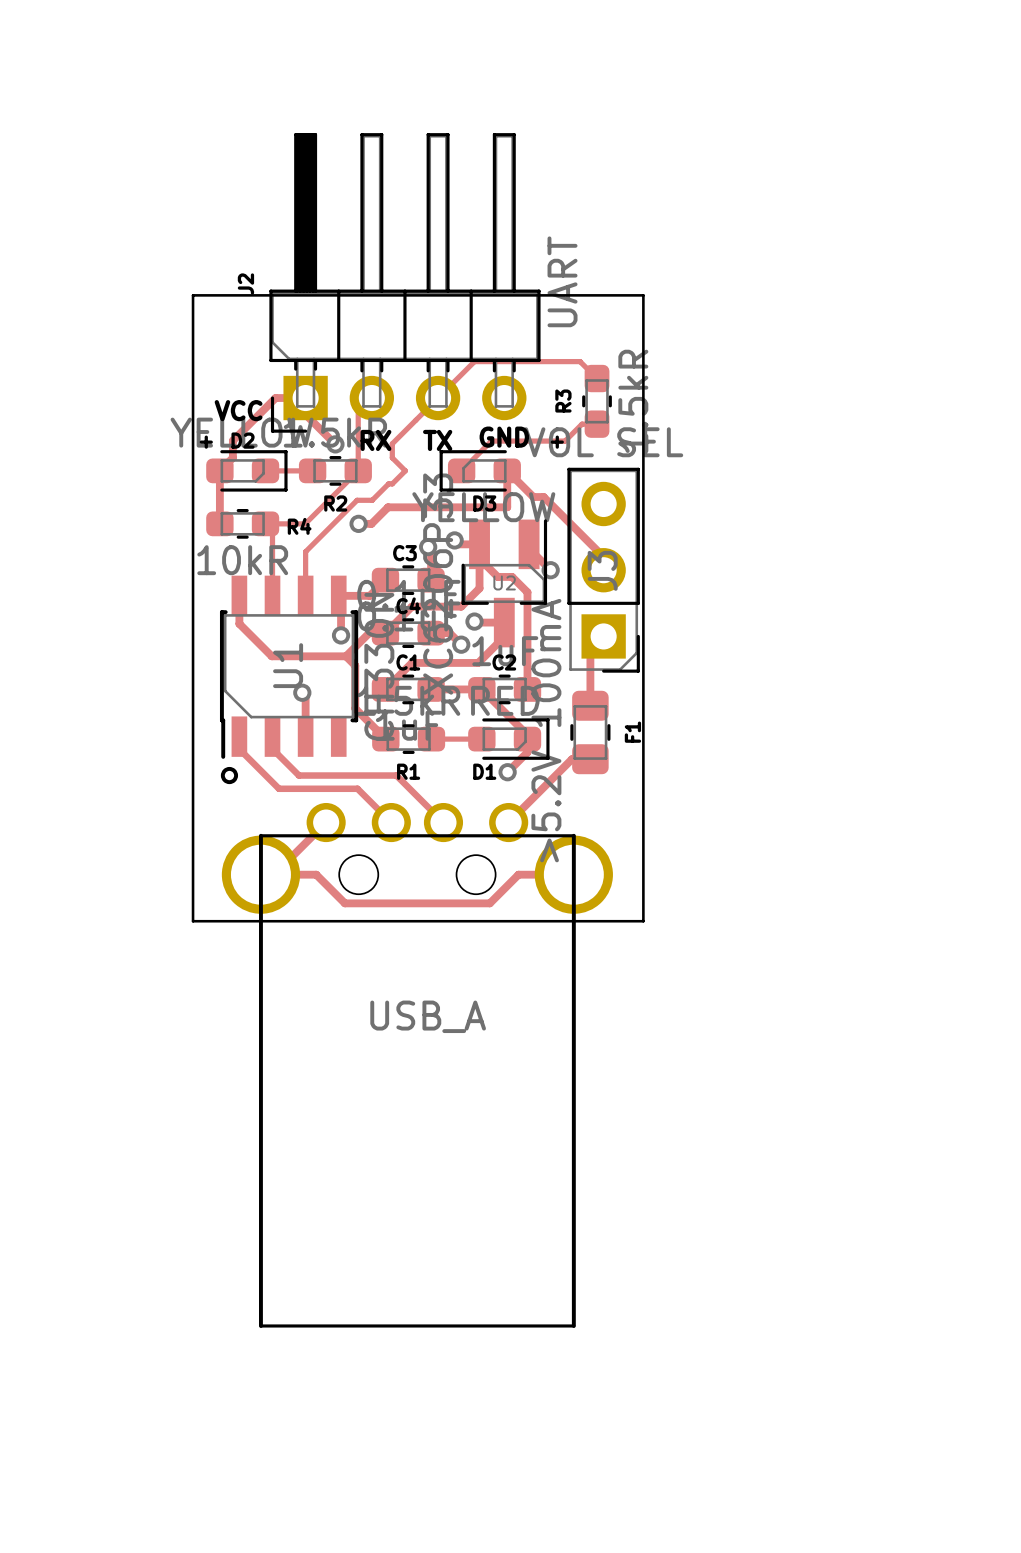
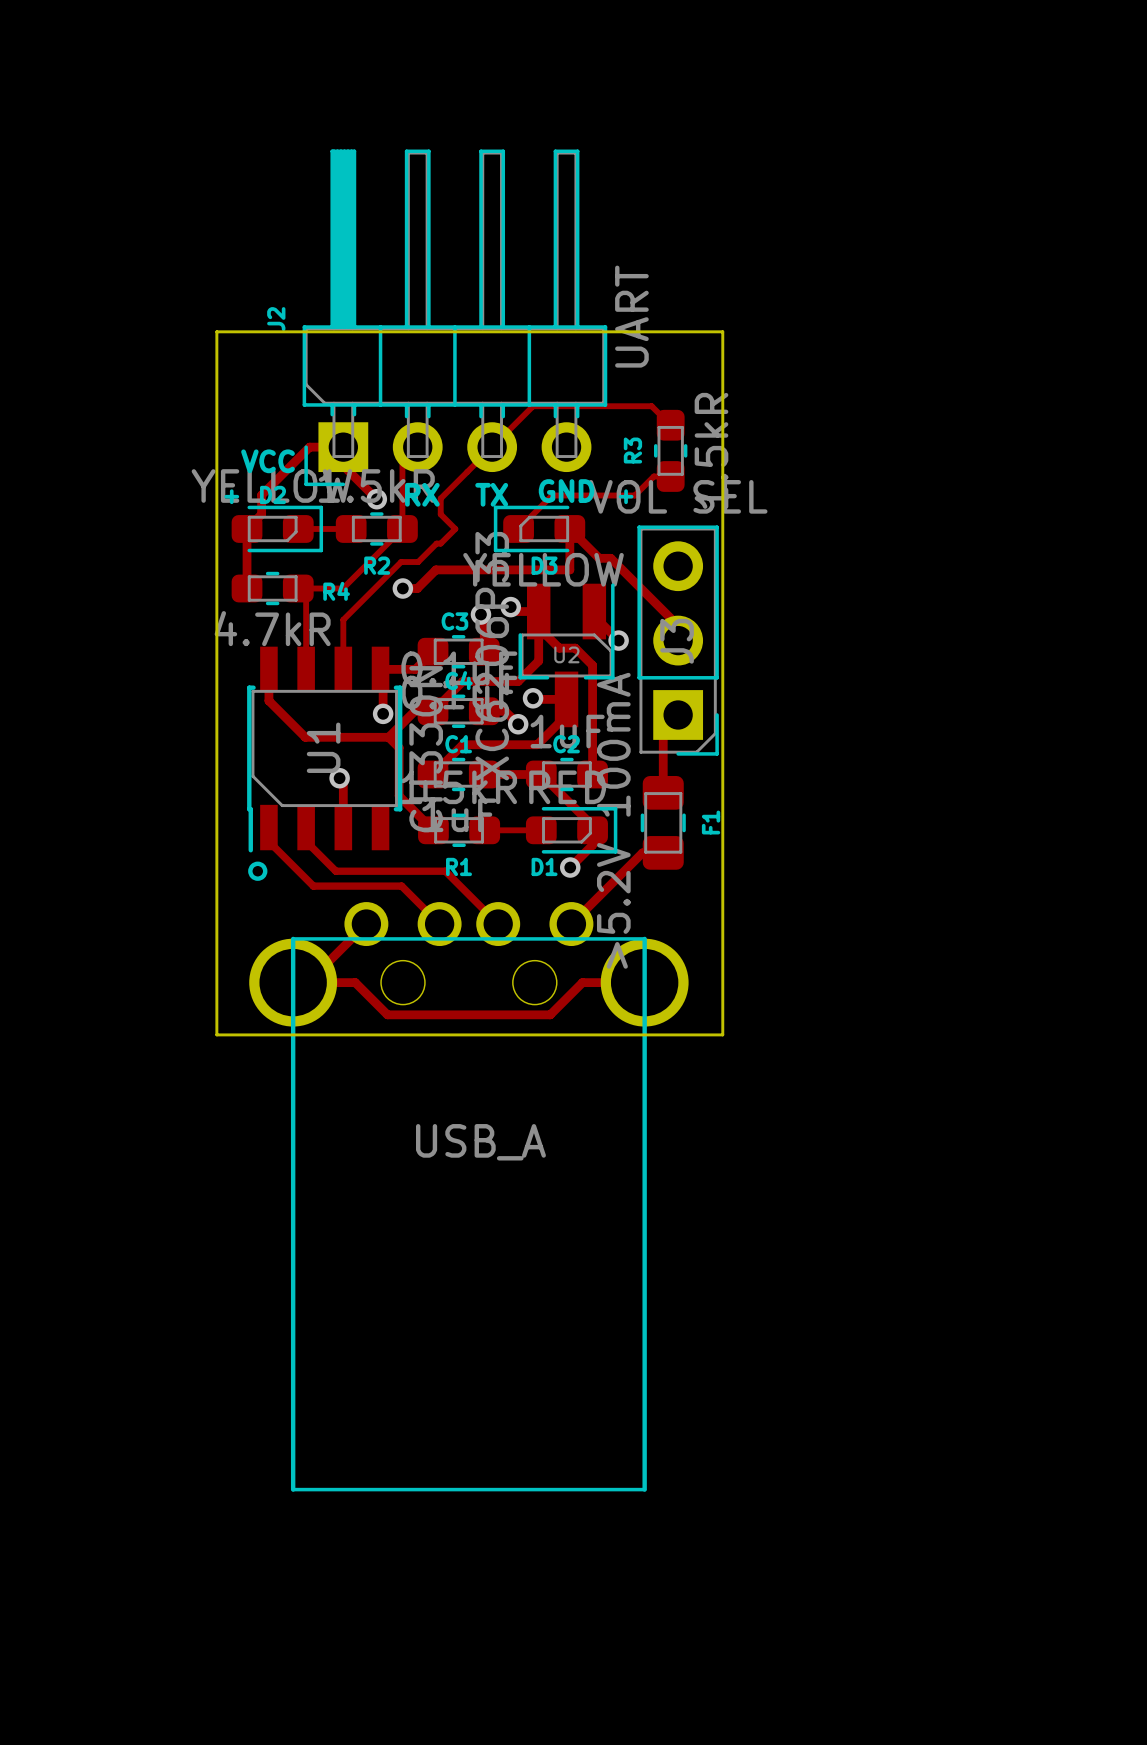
R4 value: 10kR (242, 560) -> 4.7kR (272, 628)

